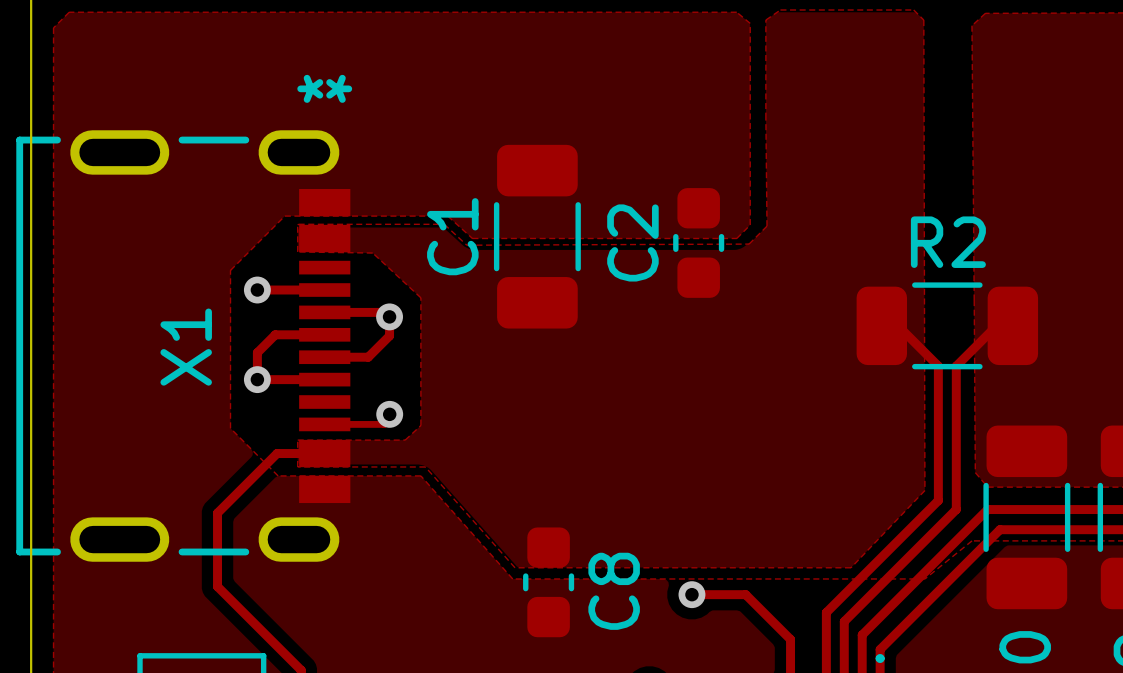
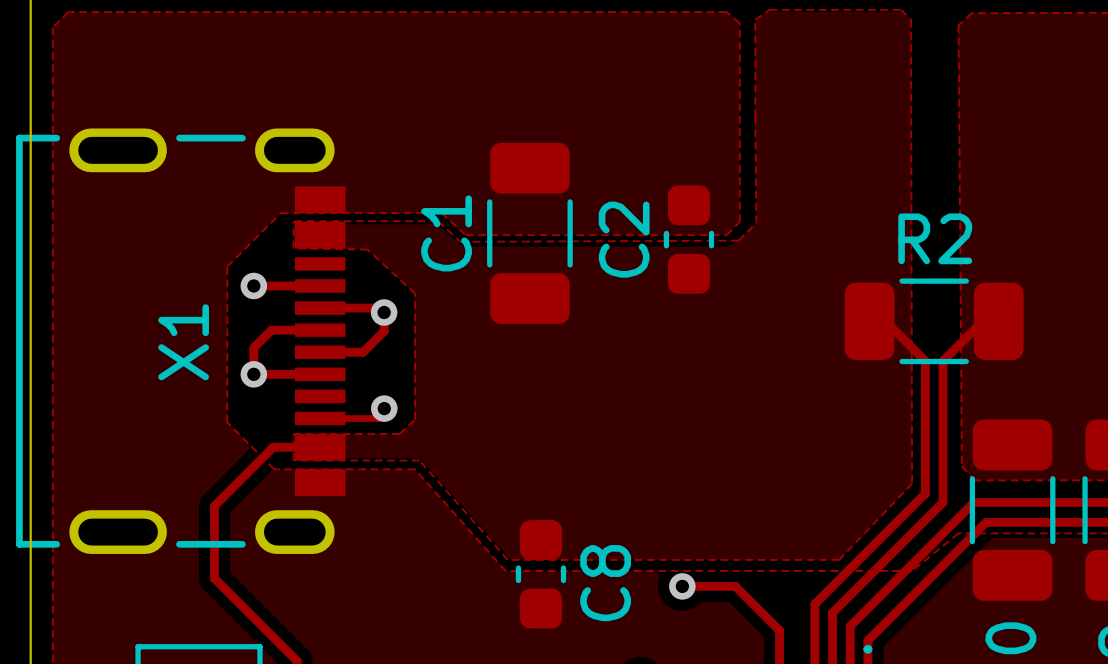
X1 footprint: [16, 130, 351, 562] -> [16, 128, 346, 554]

